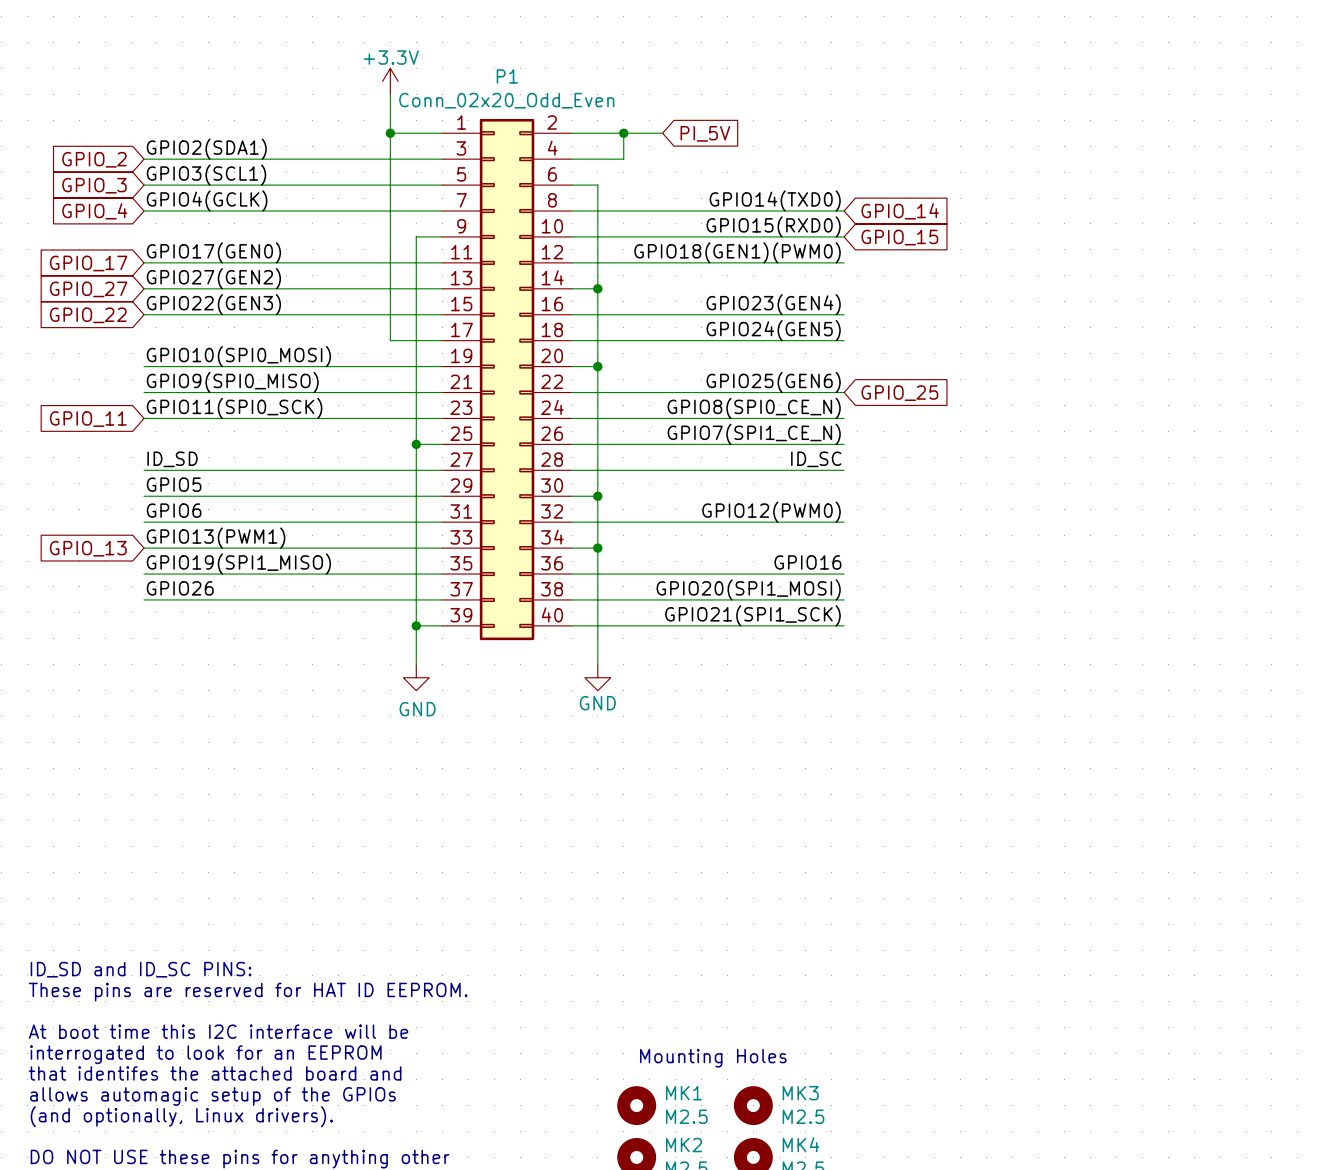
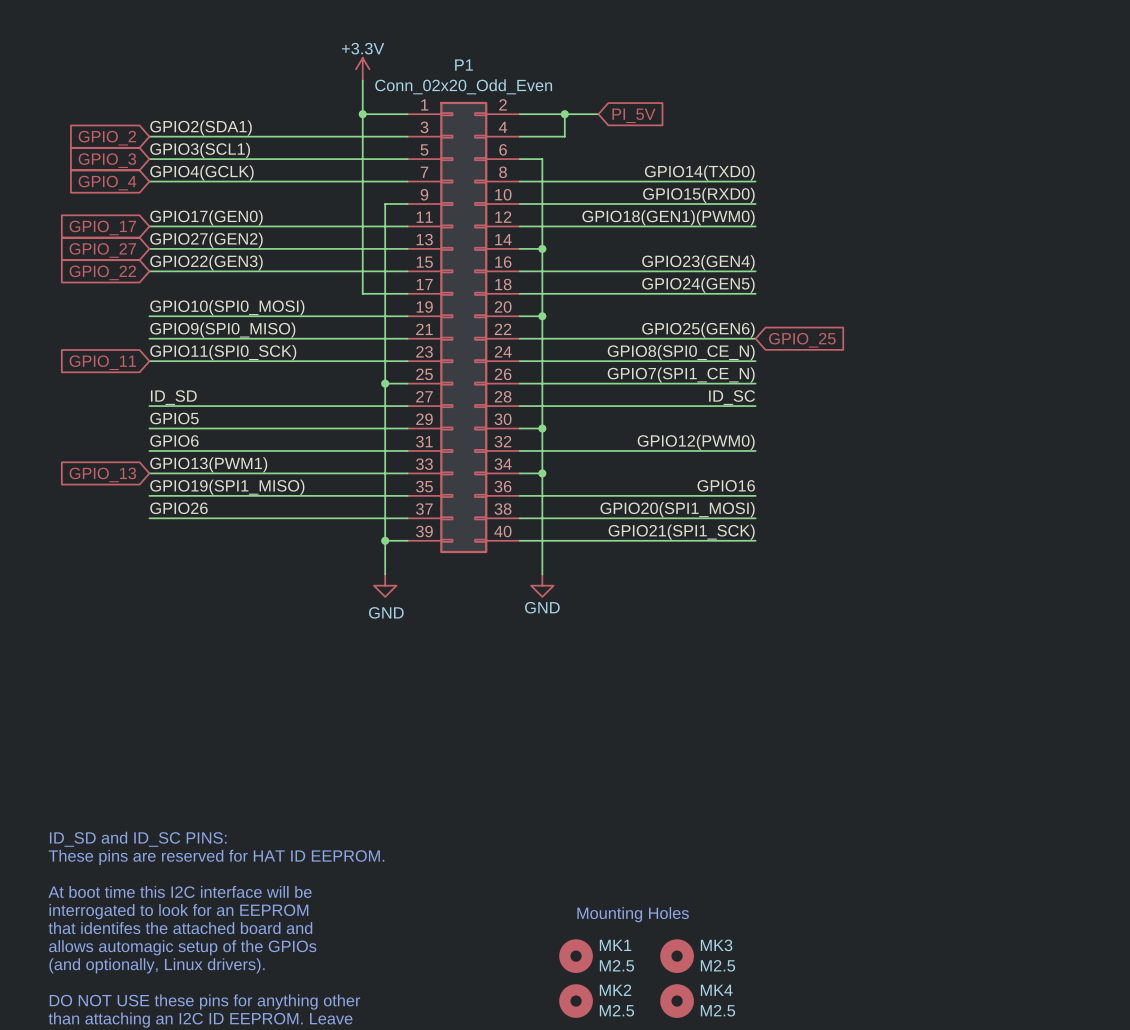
global label: GPIO_14 (900, 211) -> none
global label: GPIO_15 (899, 237) -> none

